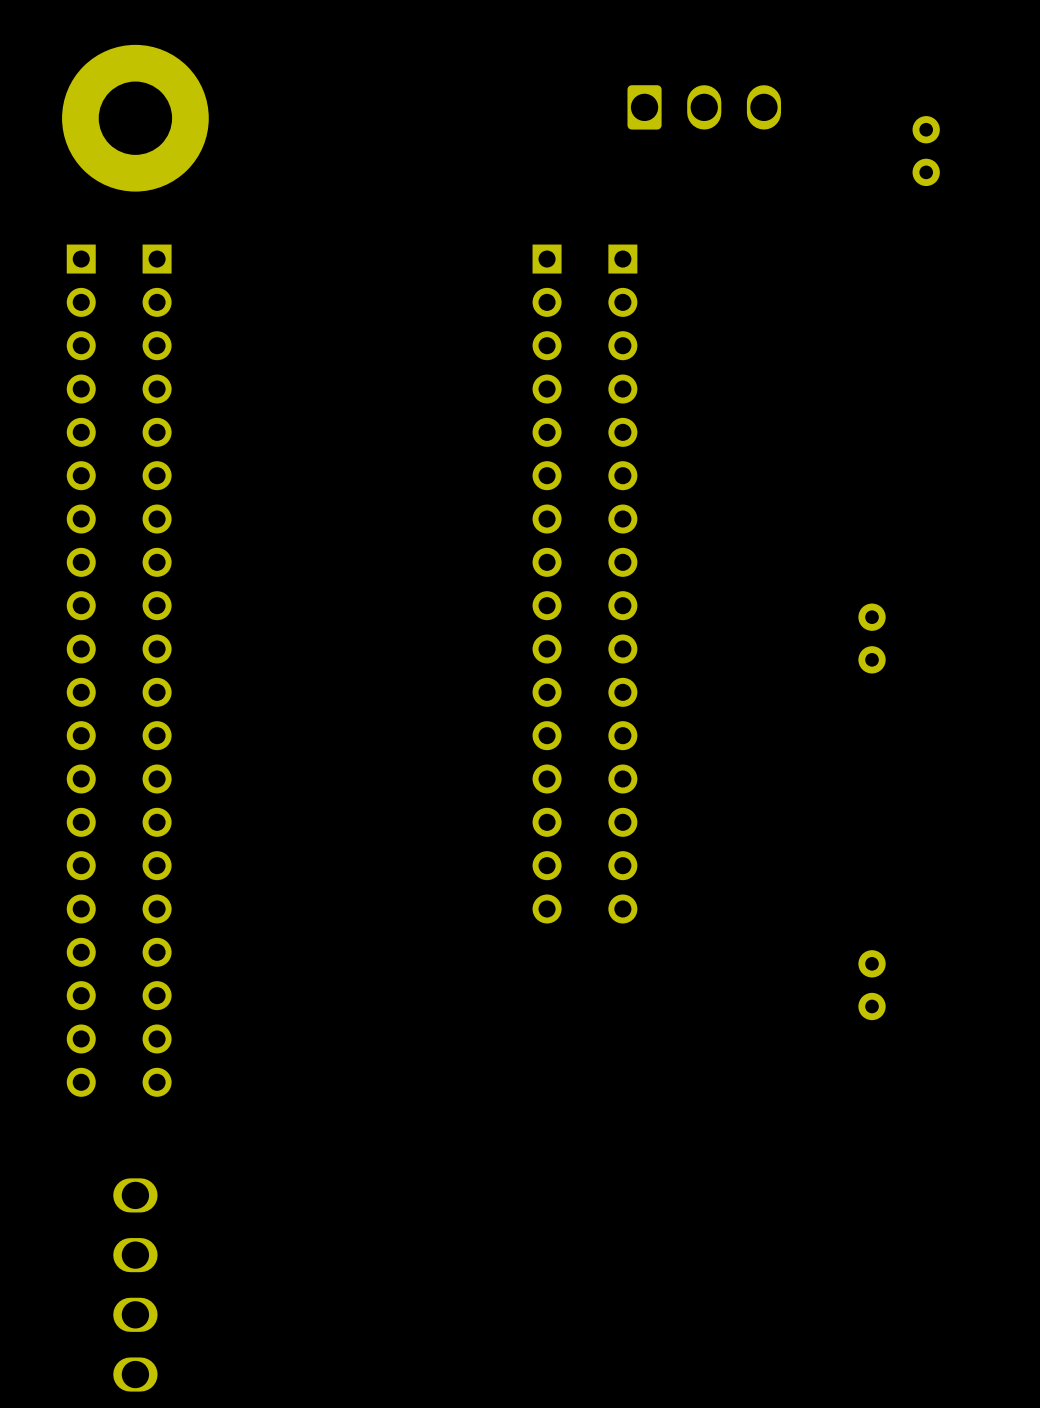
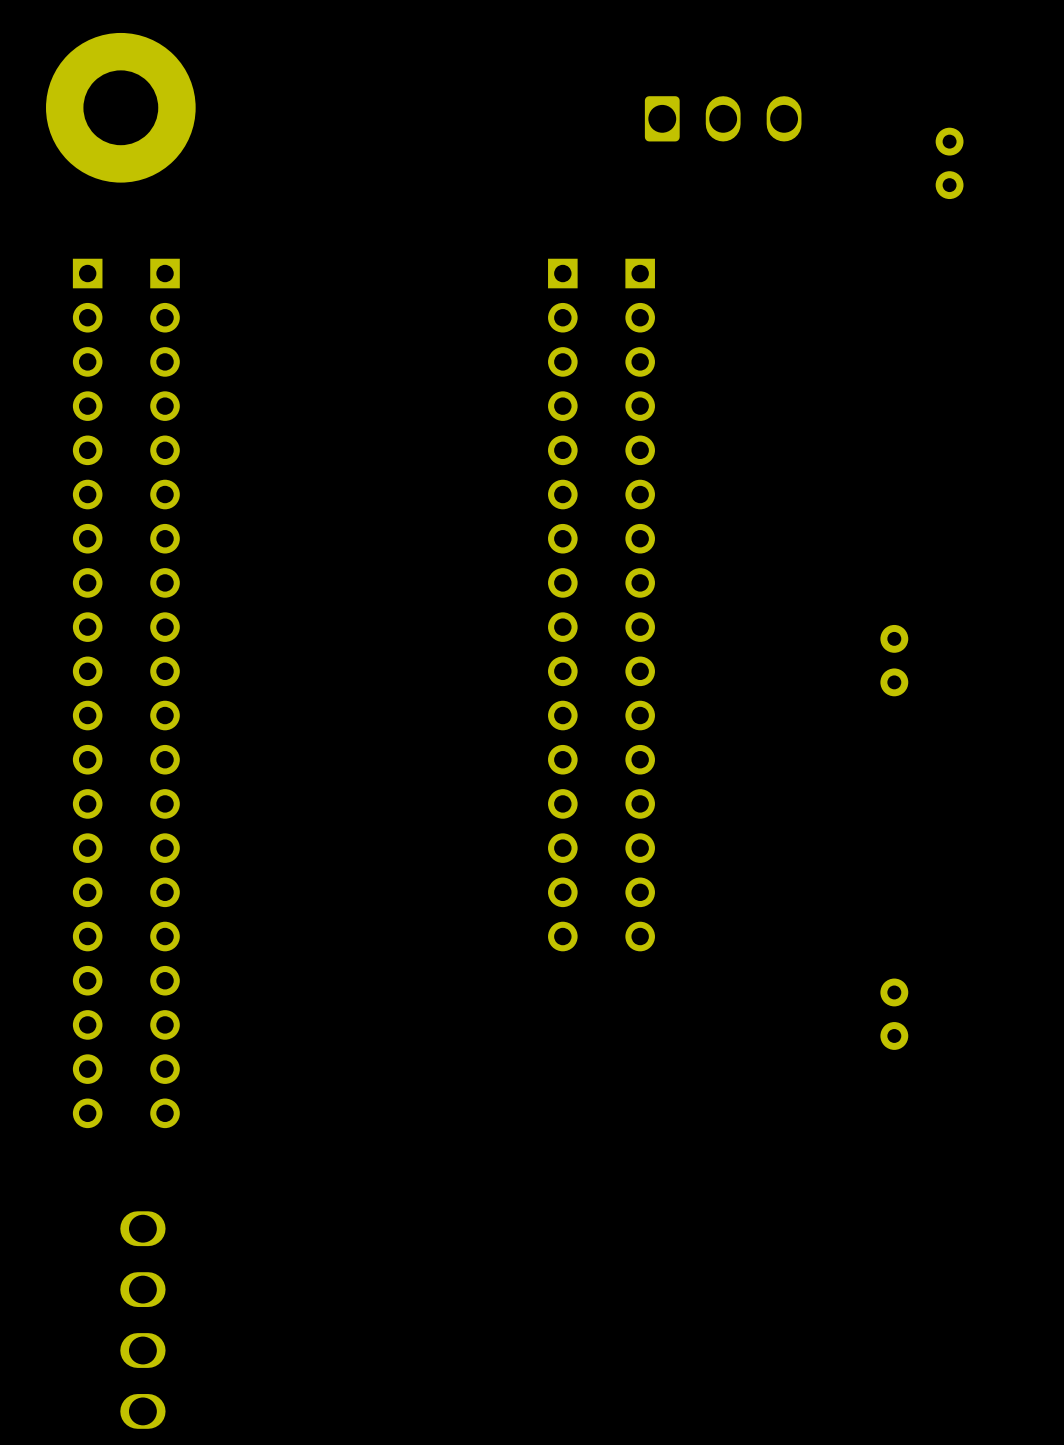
part position: (135, 118) -> (120, 107)

